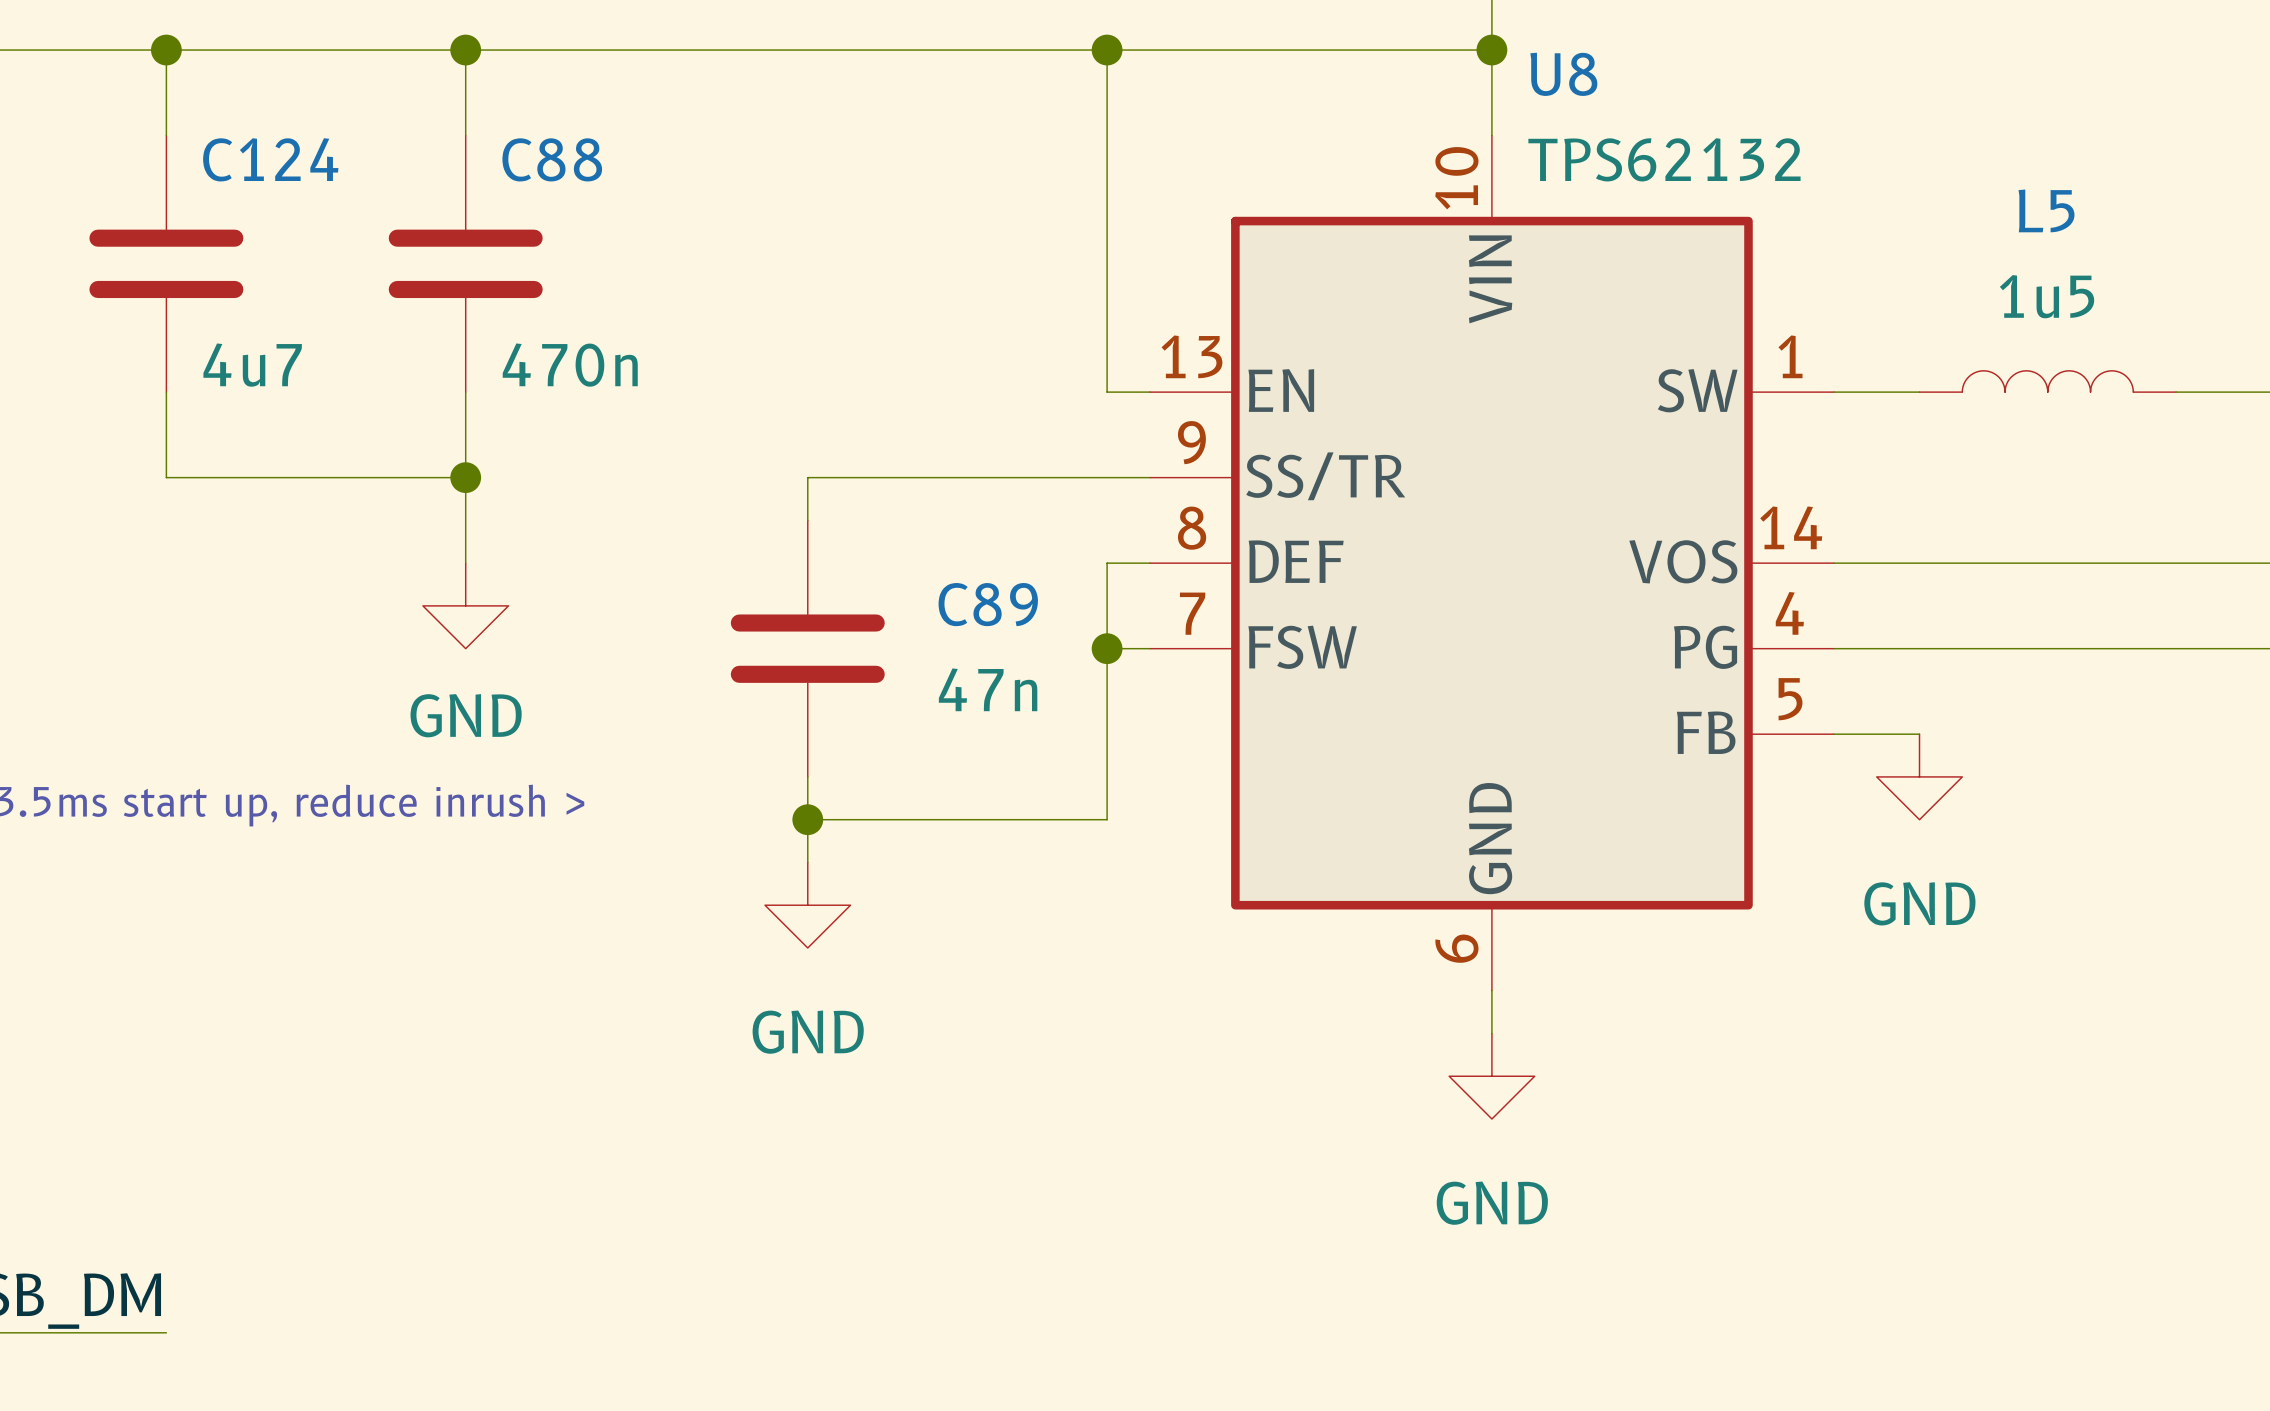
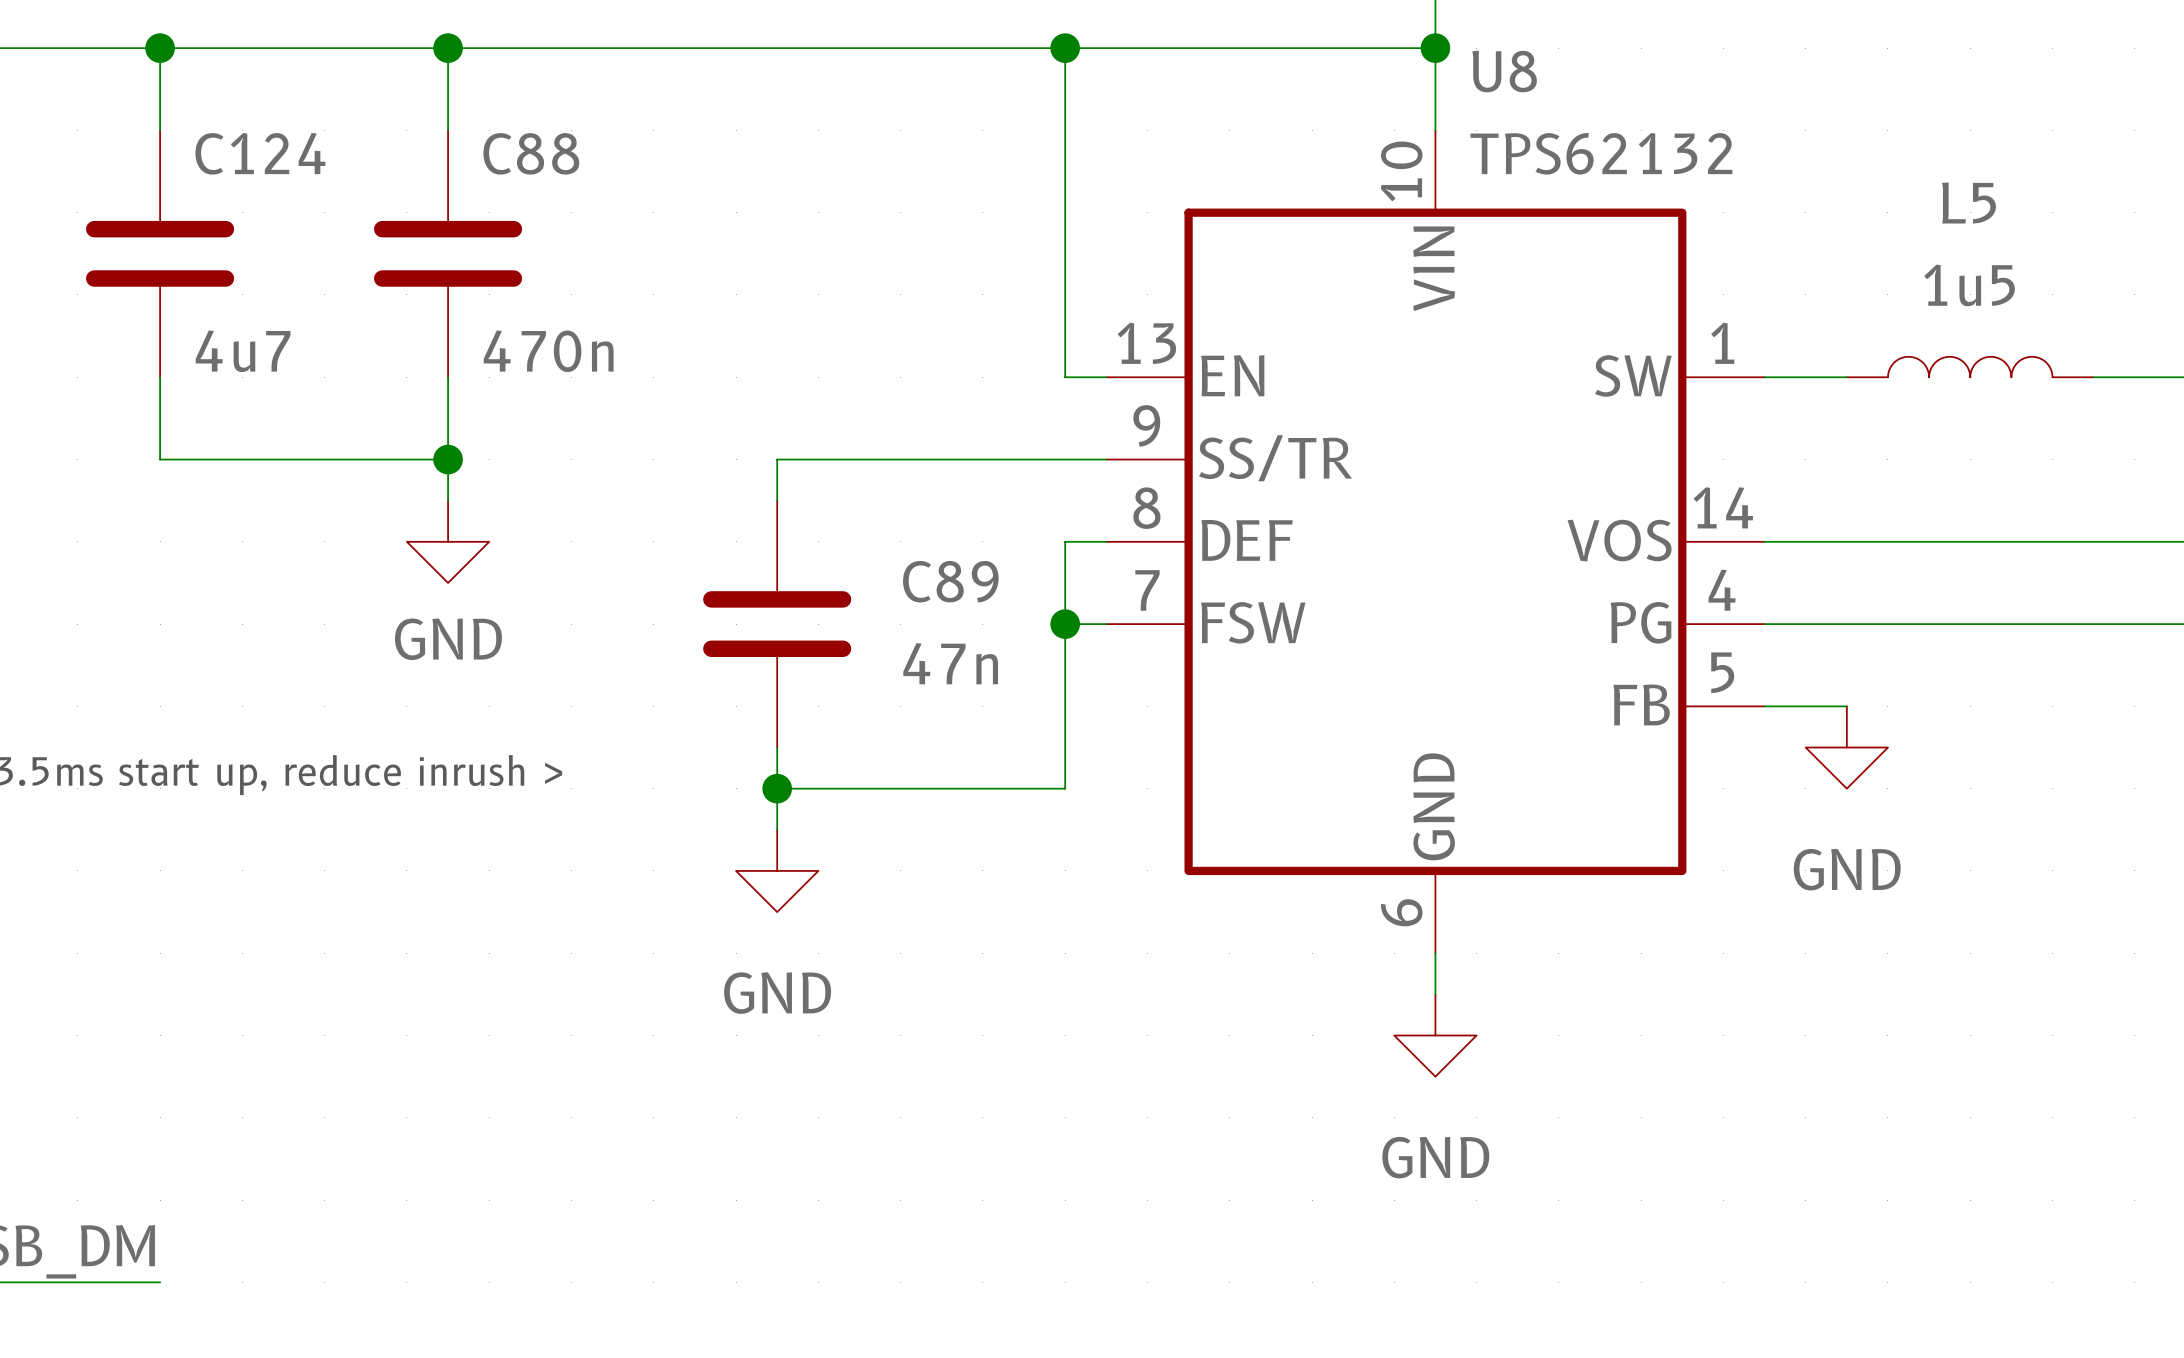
power symbol position: GND (465, 605) -> GND (448, 541)
power symbol text position: GND (466, 715) -> GND (448, 639)

